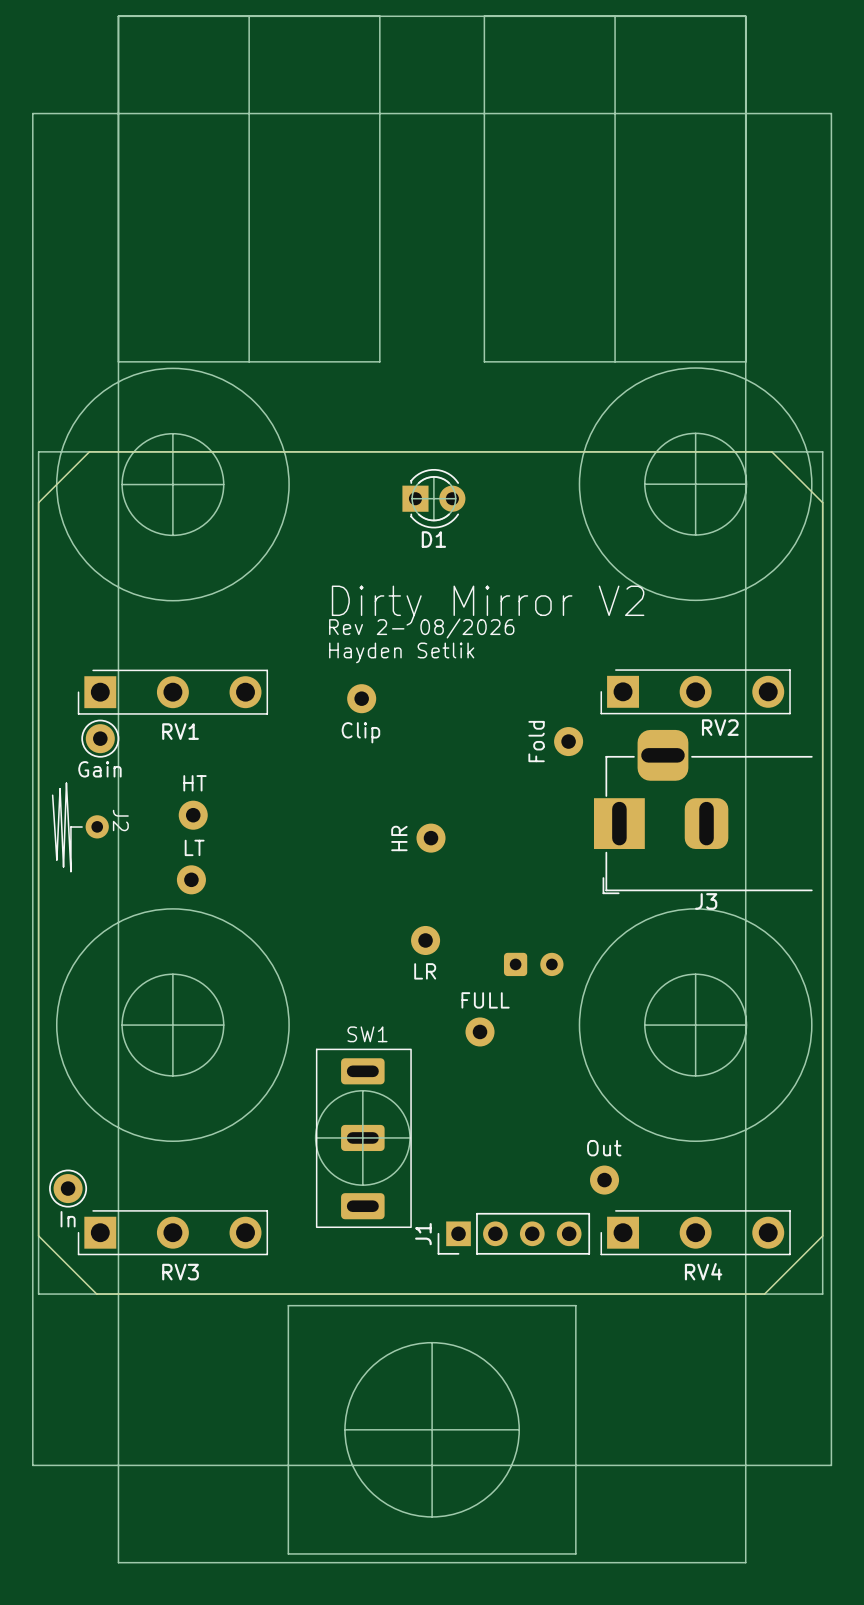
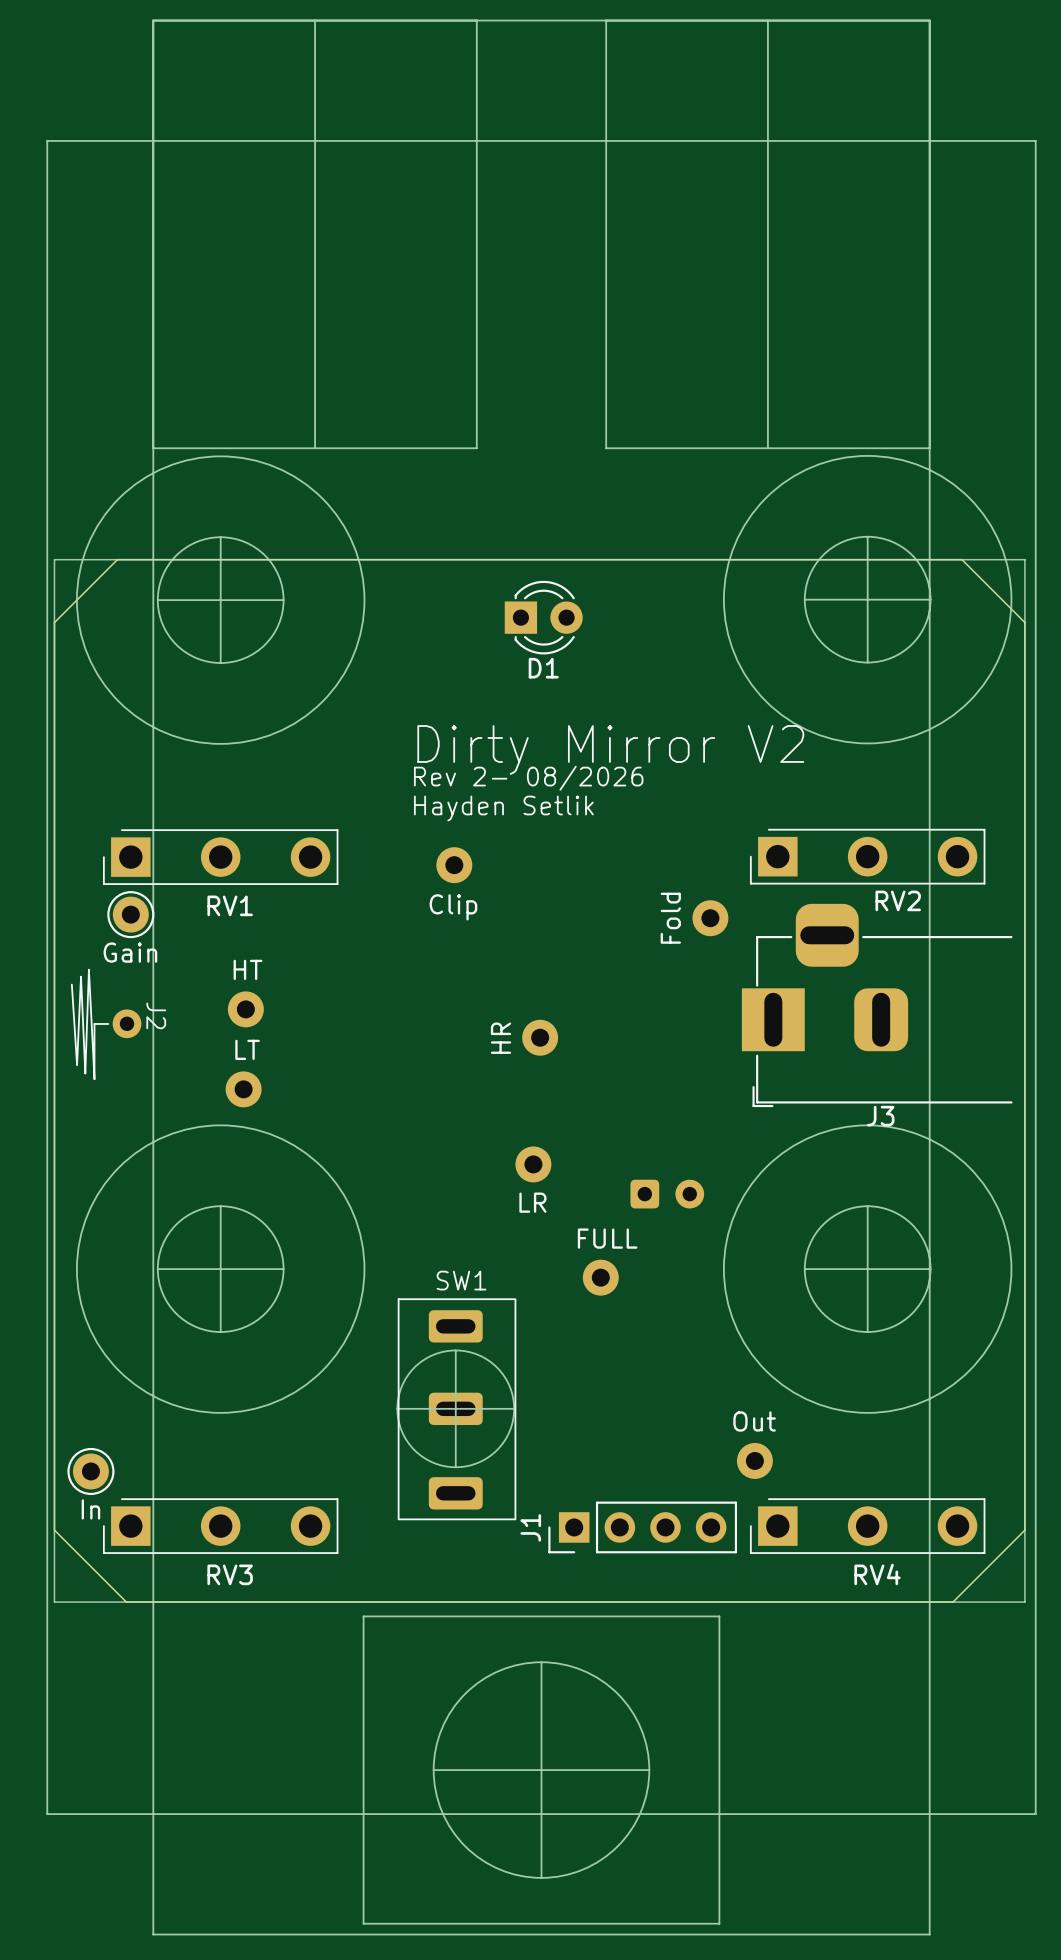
D1 footprint: [402, 468, 466, 529] -> [504, 580, 583, 655]

